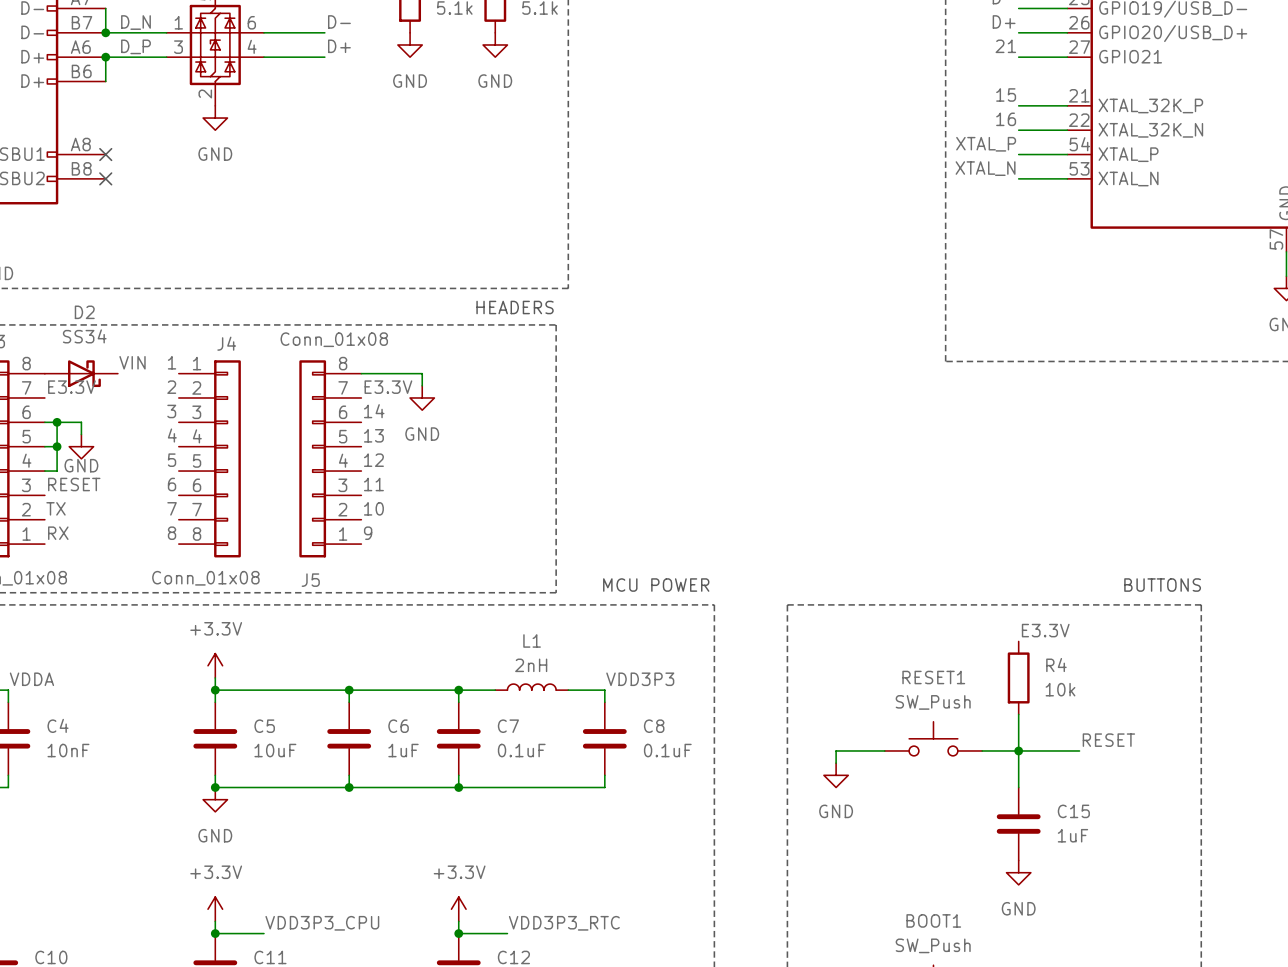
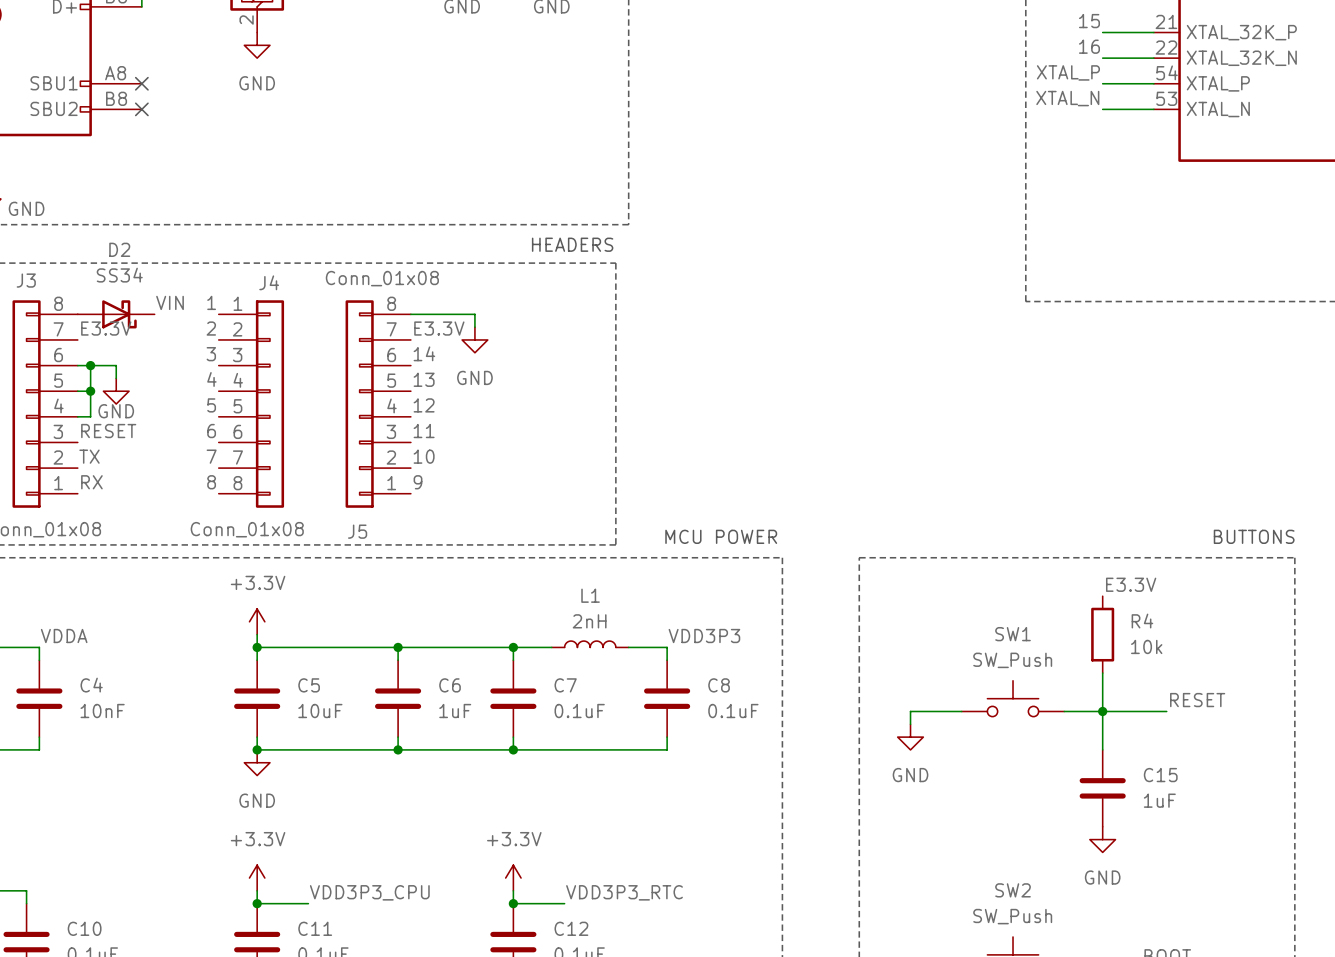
RESET1 name: RESET1 (933, 677) -> SW1 (1013, 634)
BOOT1 name: BOOT1 (933, 920) -> SW2 (1013, 890)

